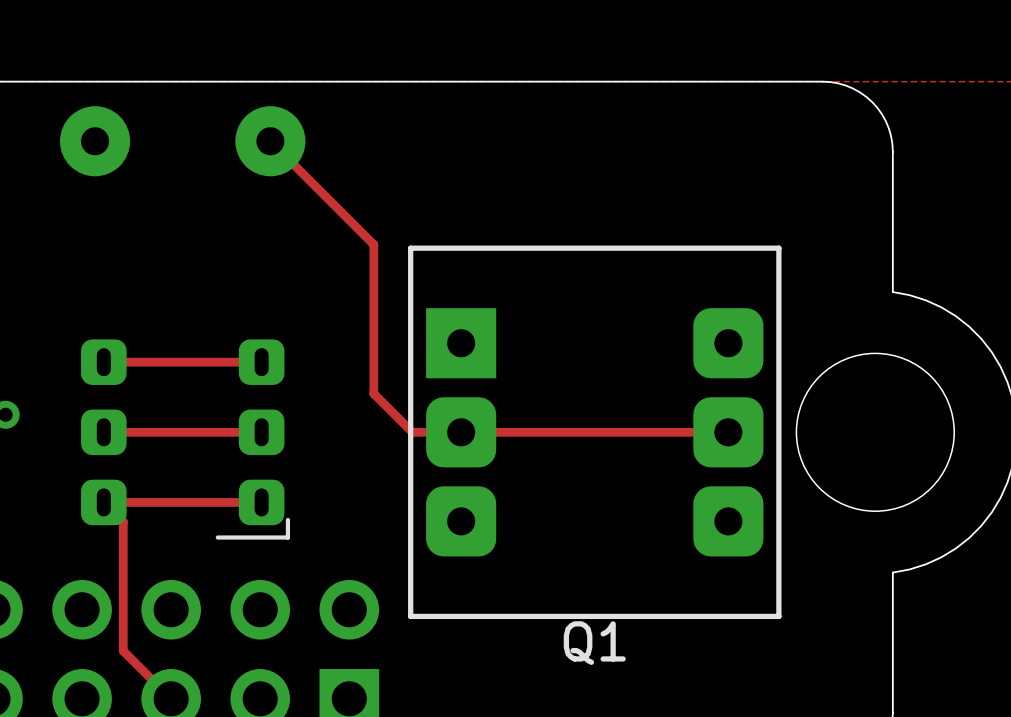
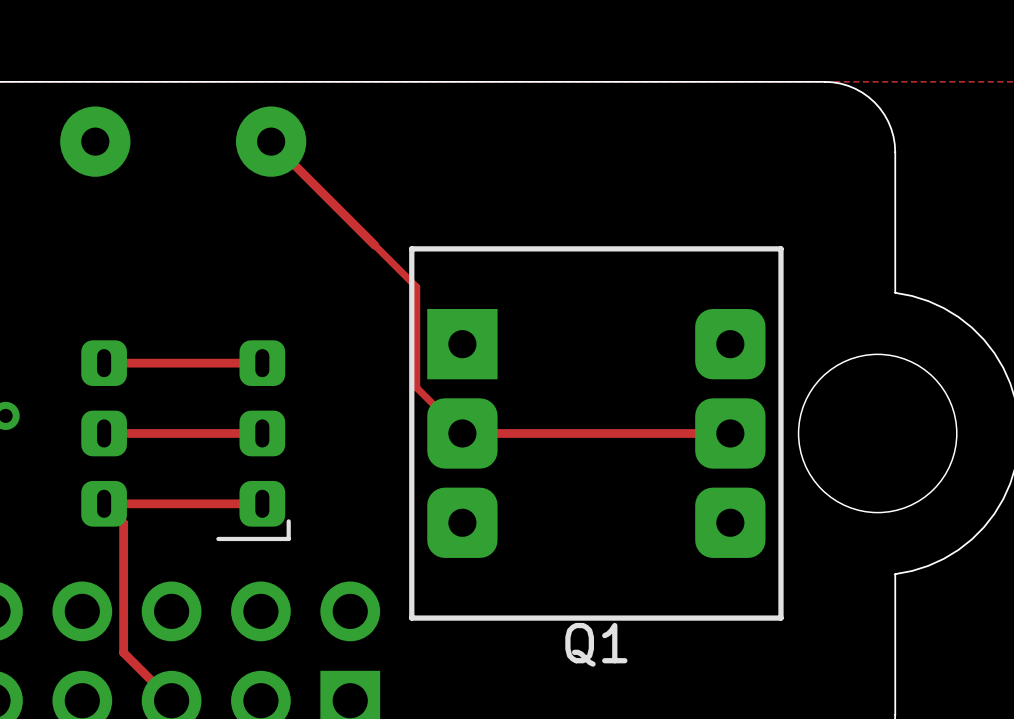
track: (373, 244) (373, 393) (412, 432) (461, 432) -> (374, 245) (416, 287) (416, 387) (462, 433)

